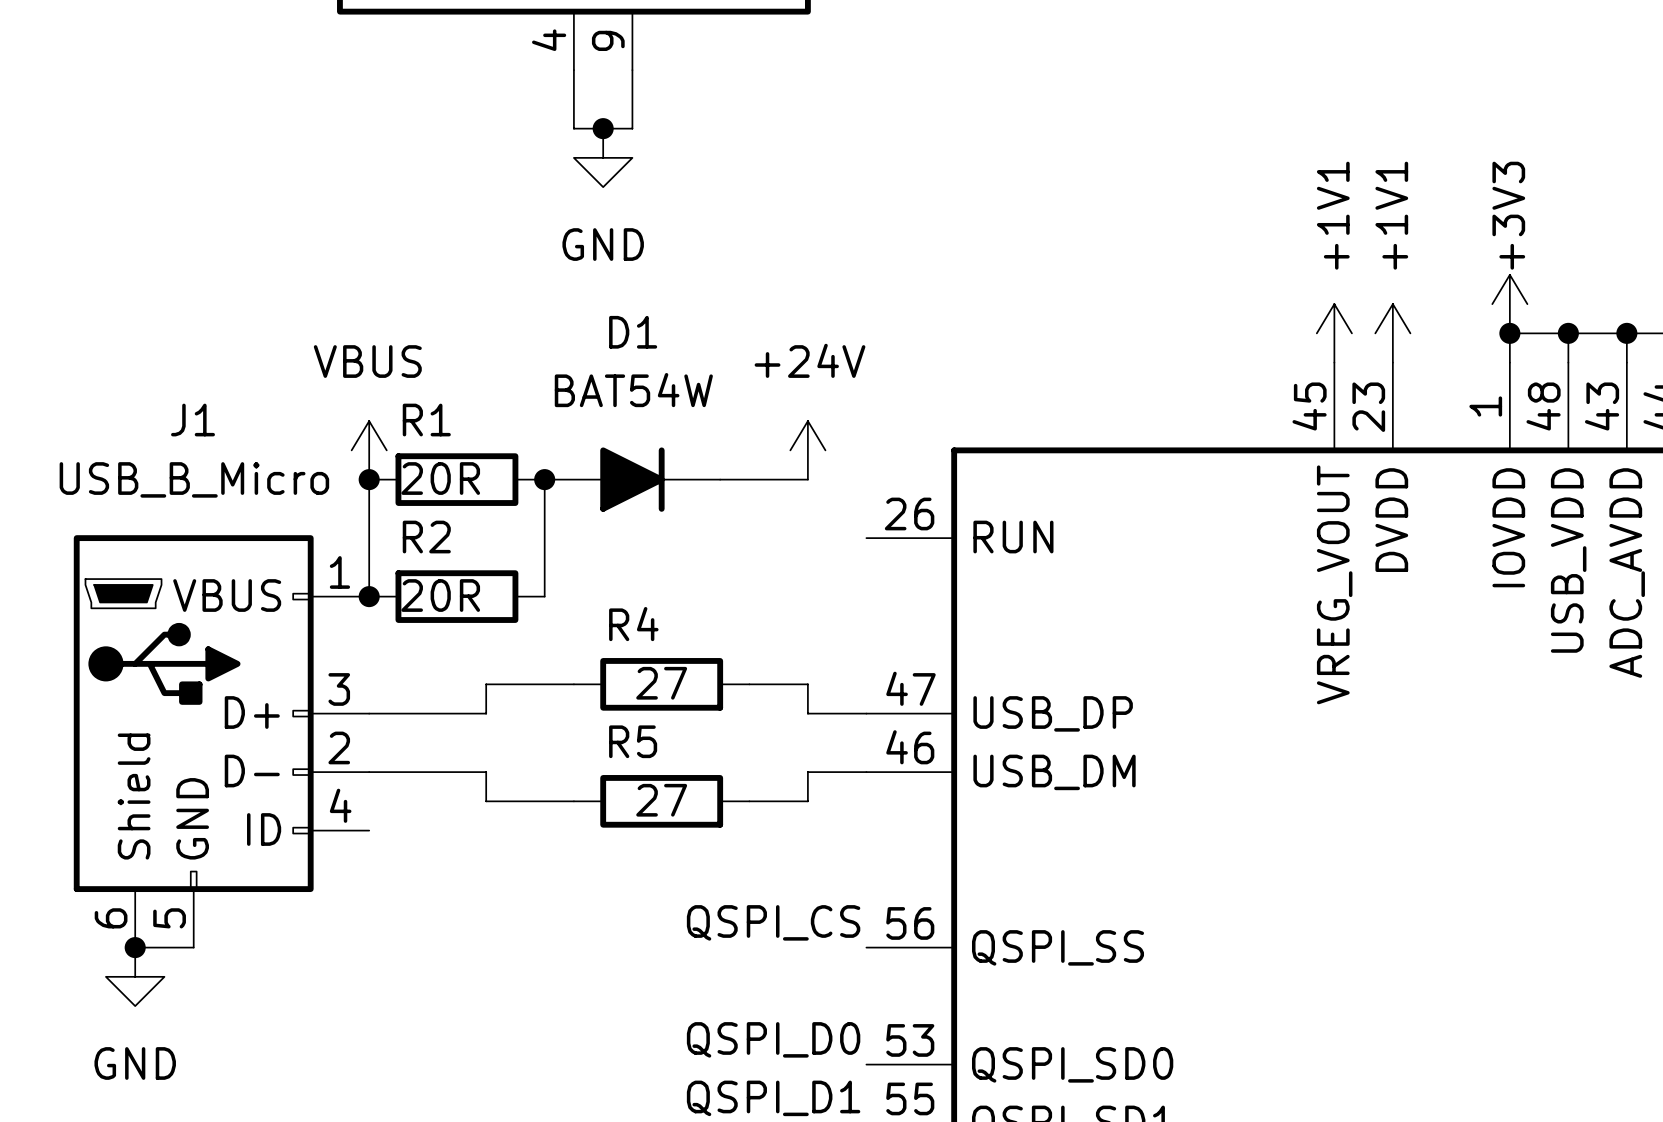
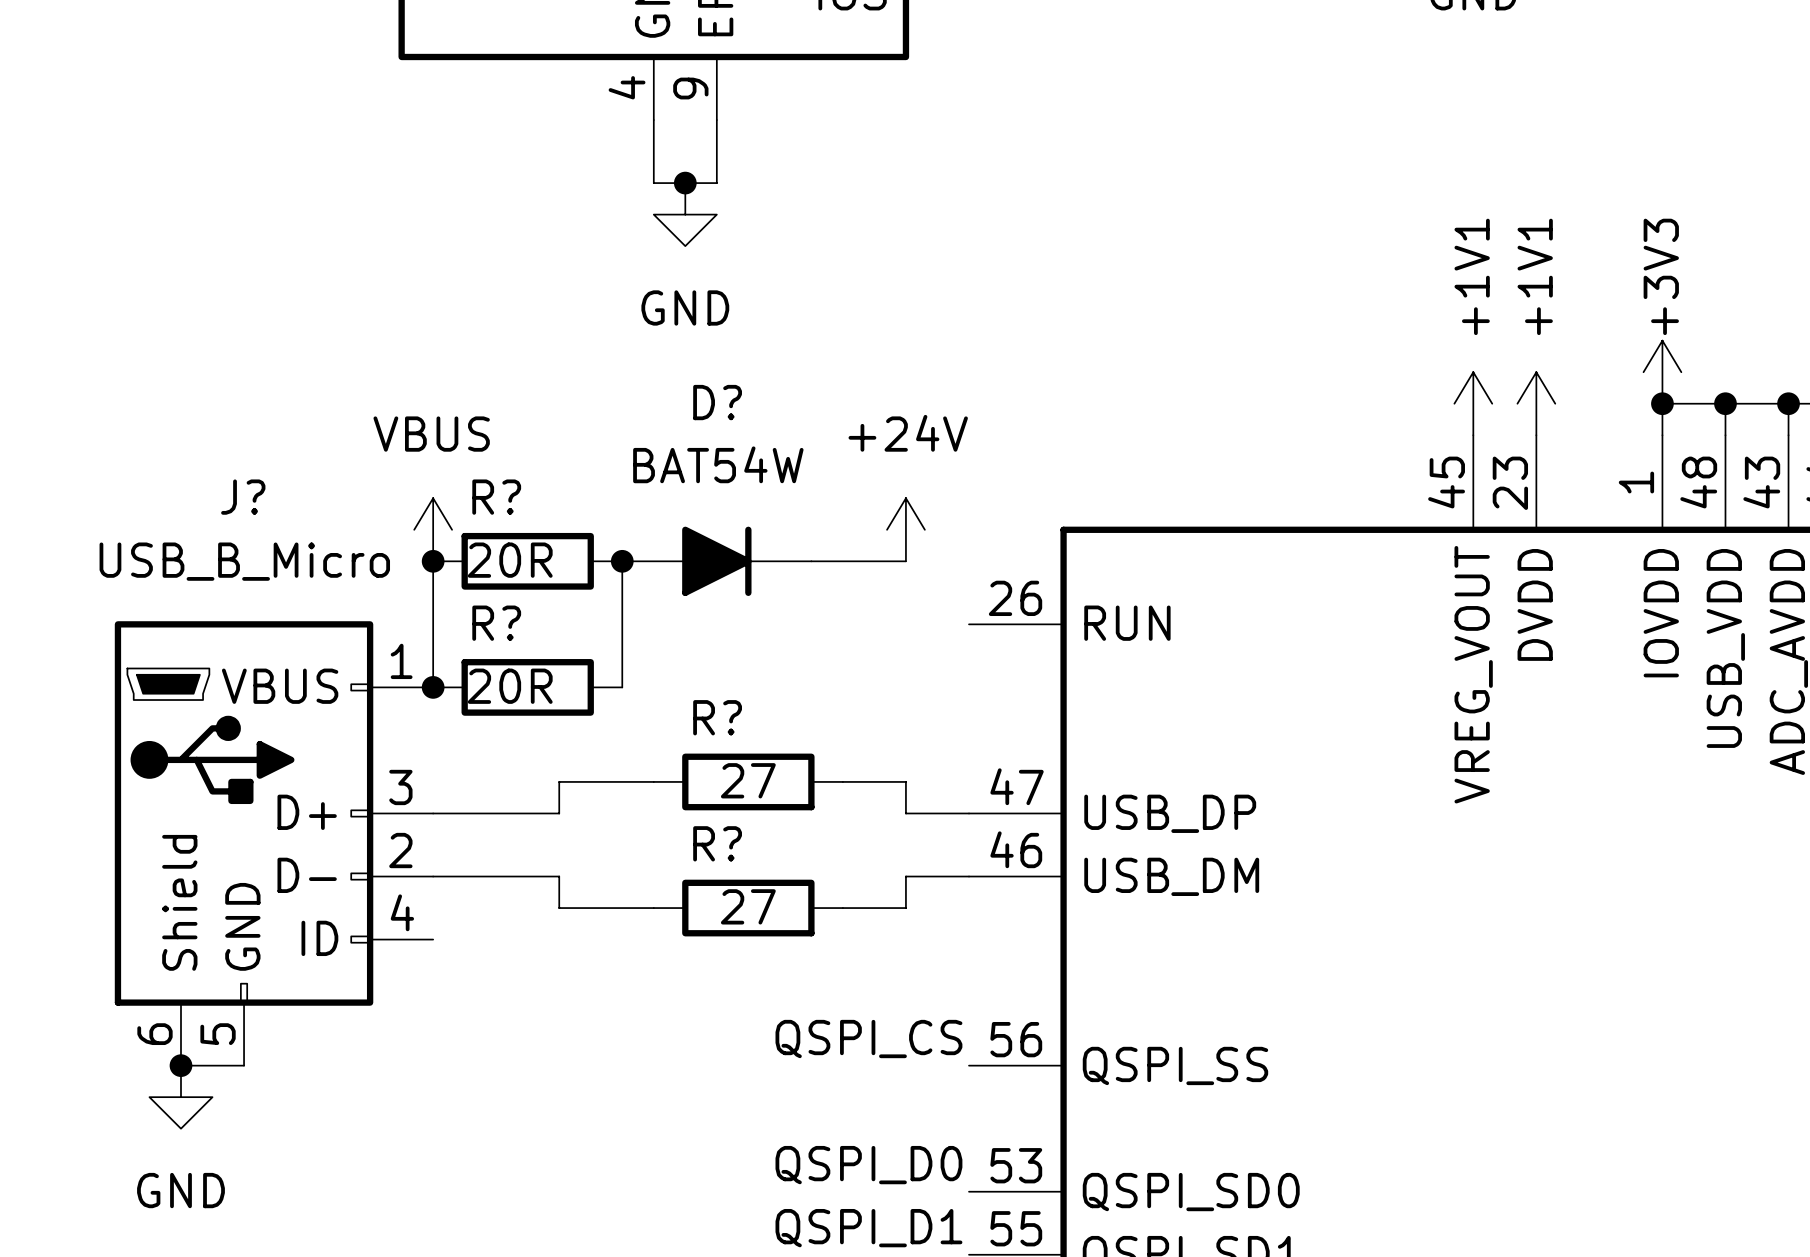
D1 name: D1 (633, 332) -> D? (717, 402)
J1 name: J1 (193, 420) -> J? (243, 497)
R1 name: R1 (426, 420) -> R? (496, 497)
R2 name: R2 (426, 537) -> R? (496, 623)
R4 name: R4 (633, 624) -> R? (717, 717)
R5 name: R5 (633, 741) -> R? (717, 843)

